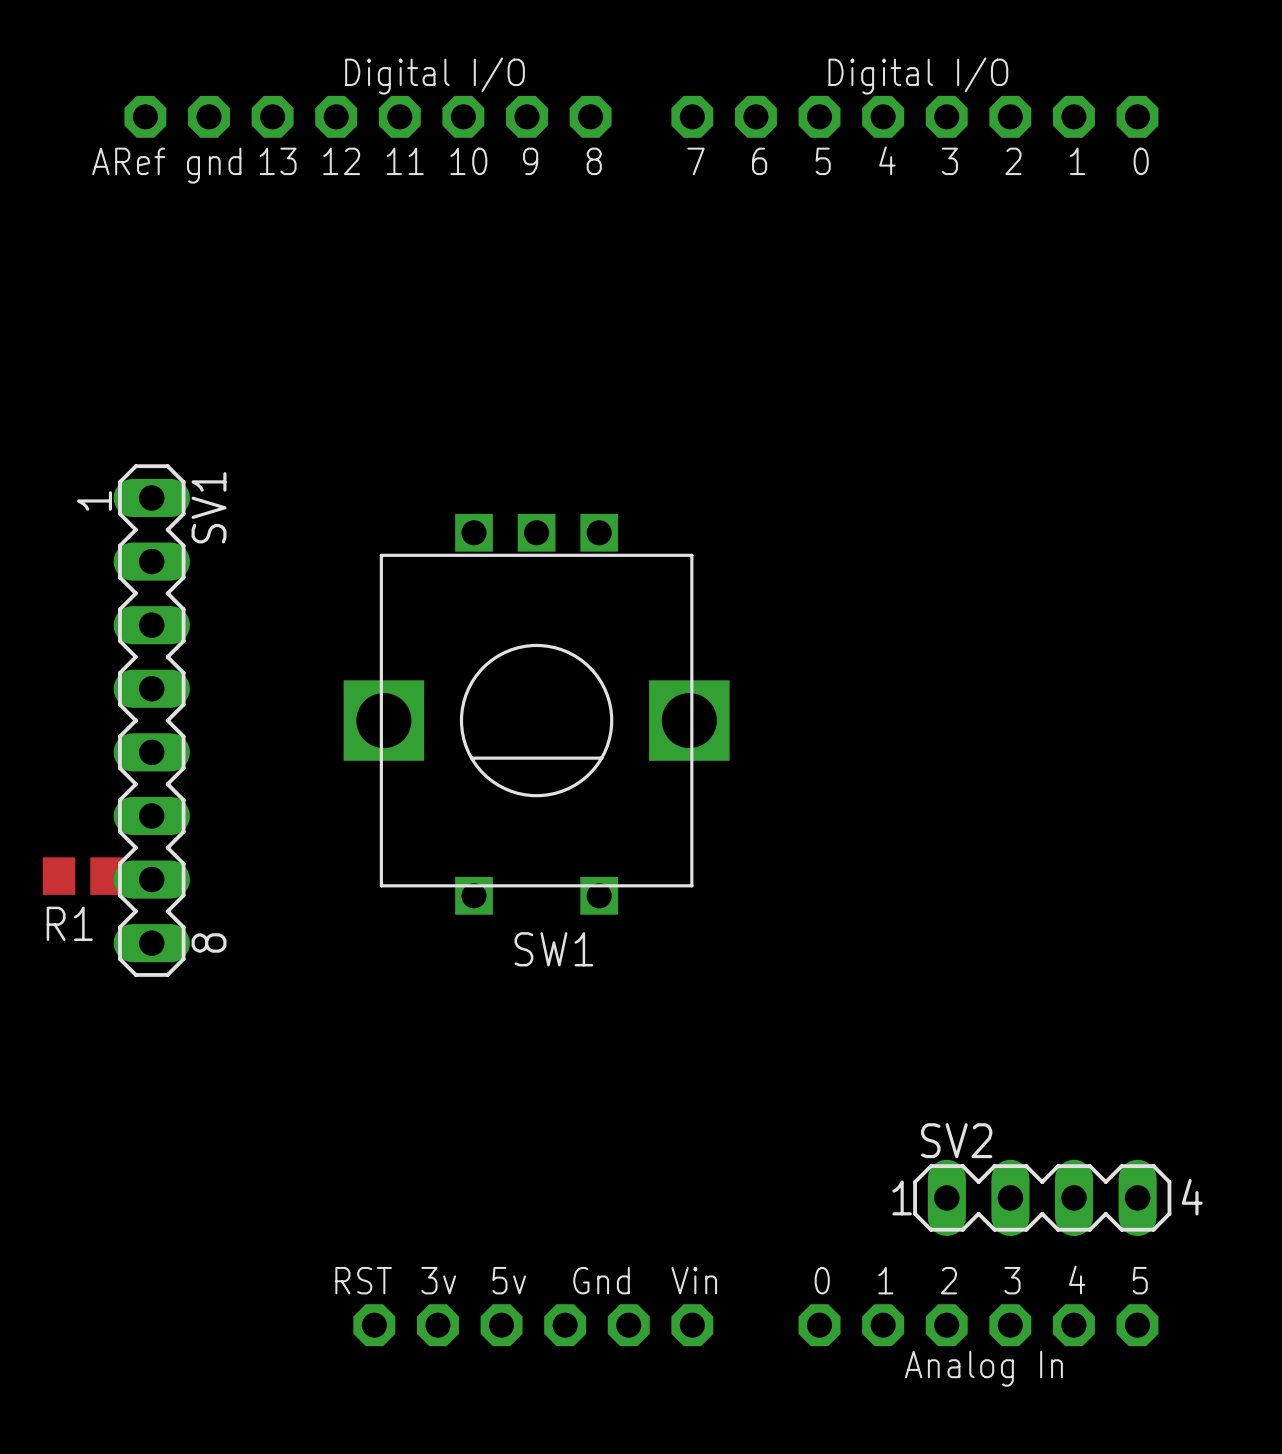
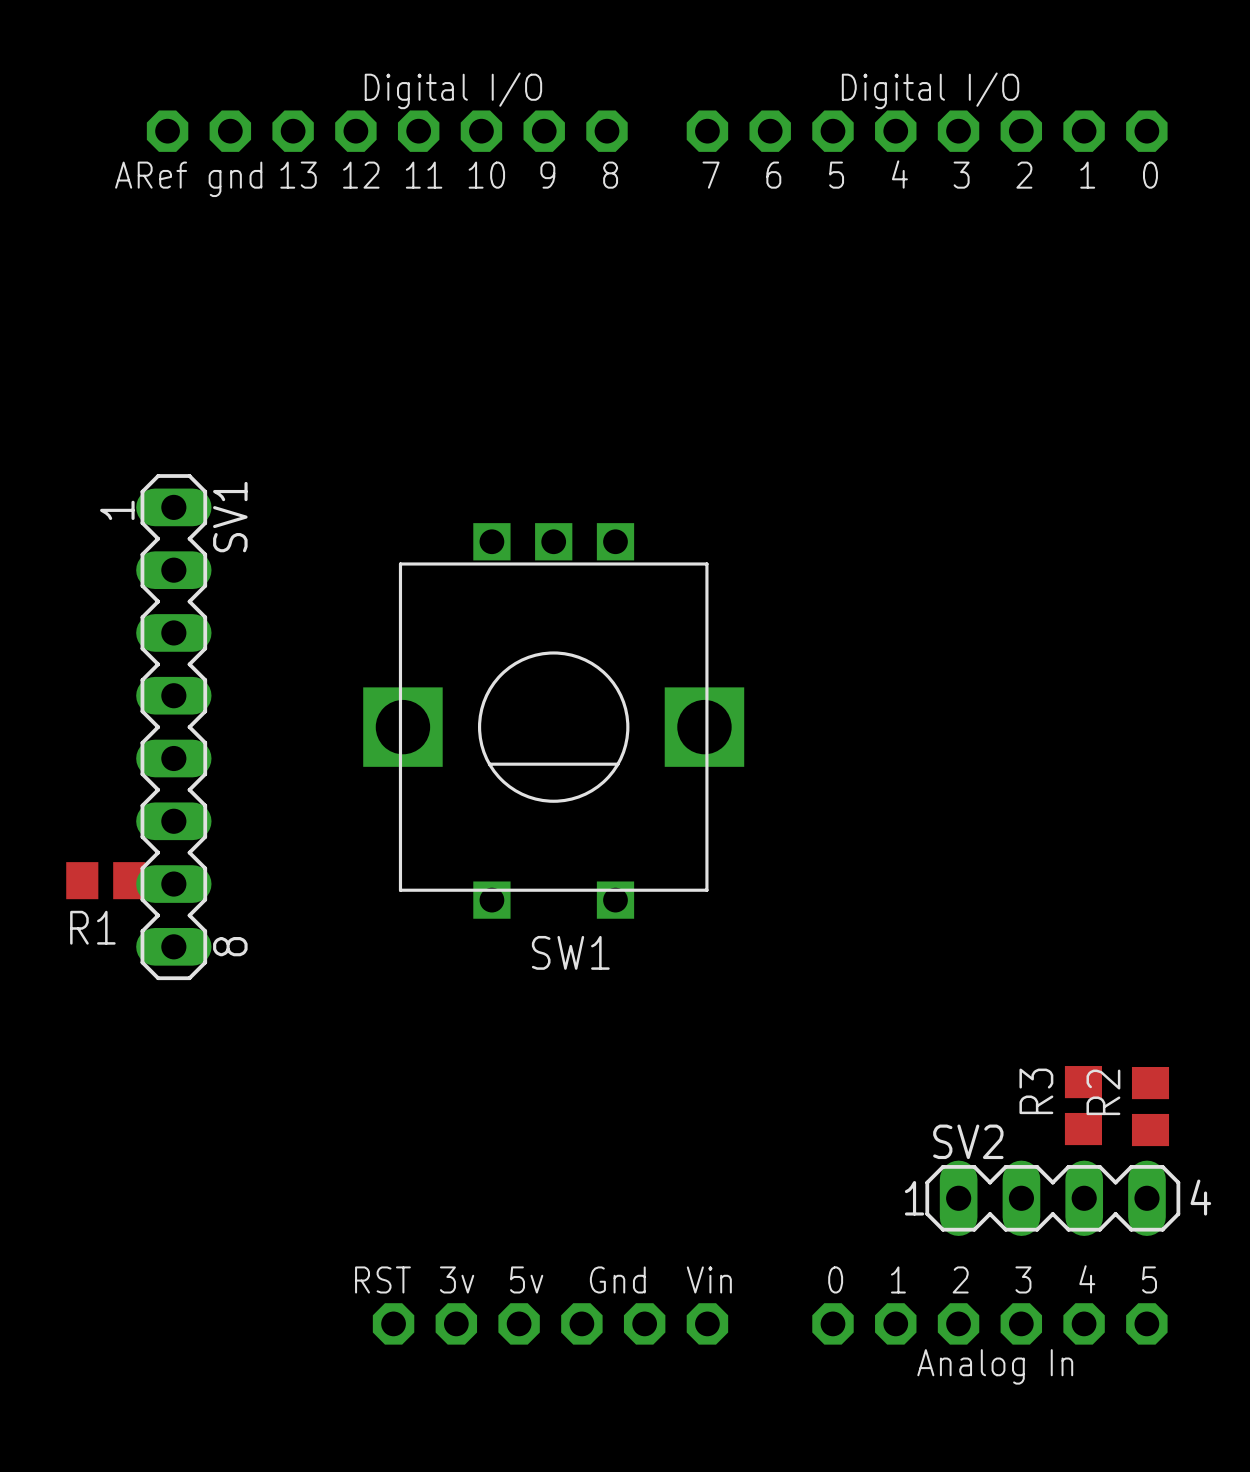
R3: none -> (1083, 1105)
R2: none -> (1150, 1106)

